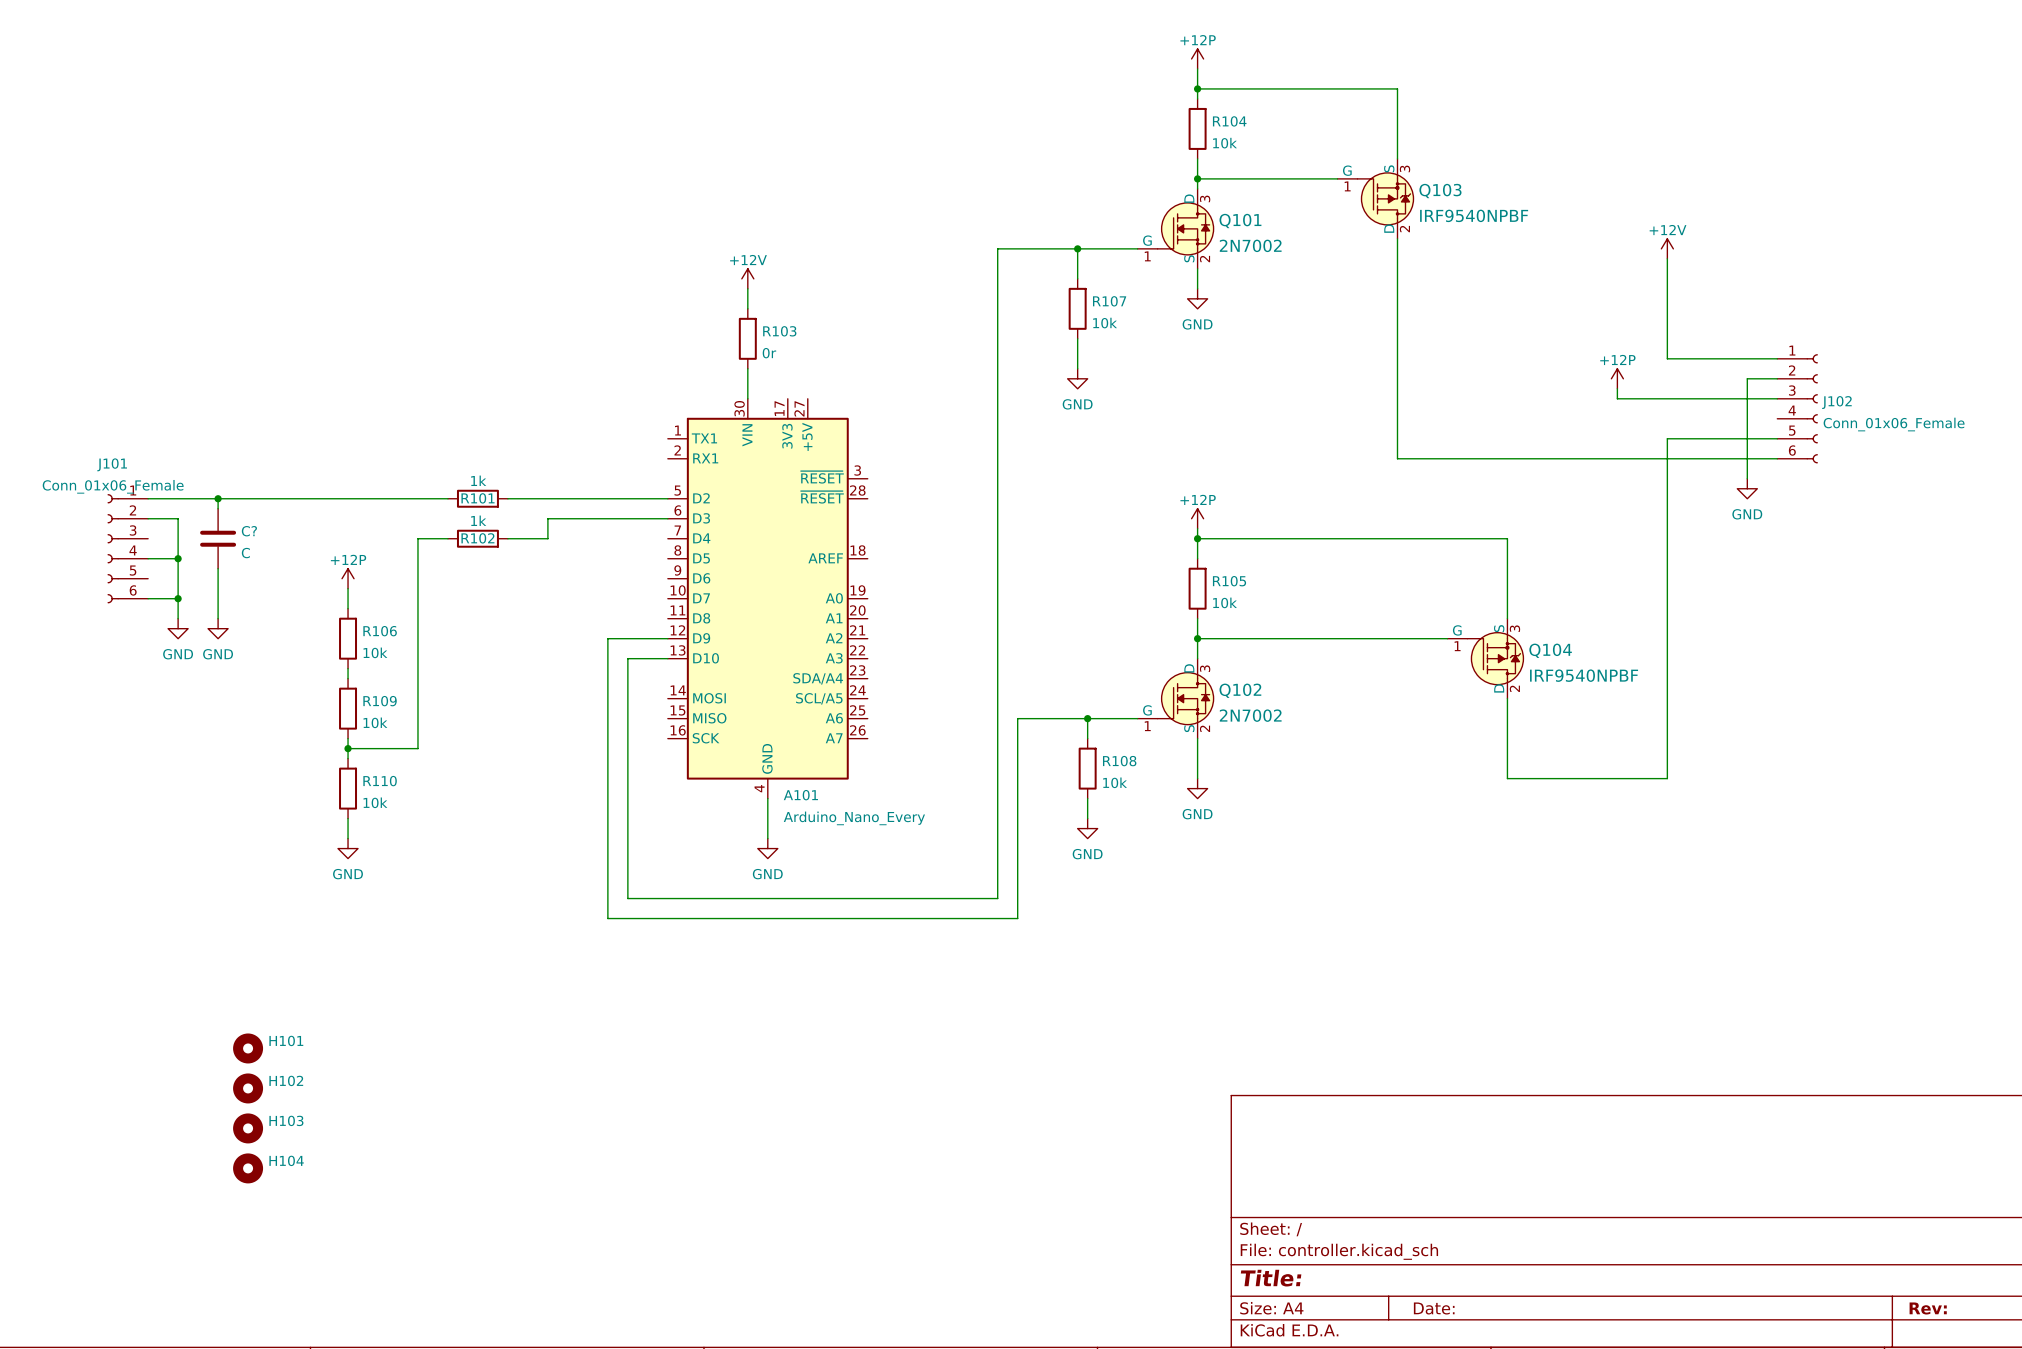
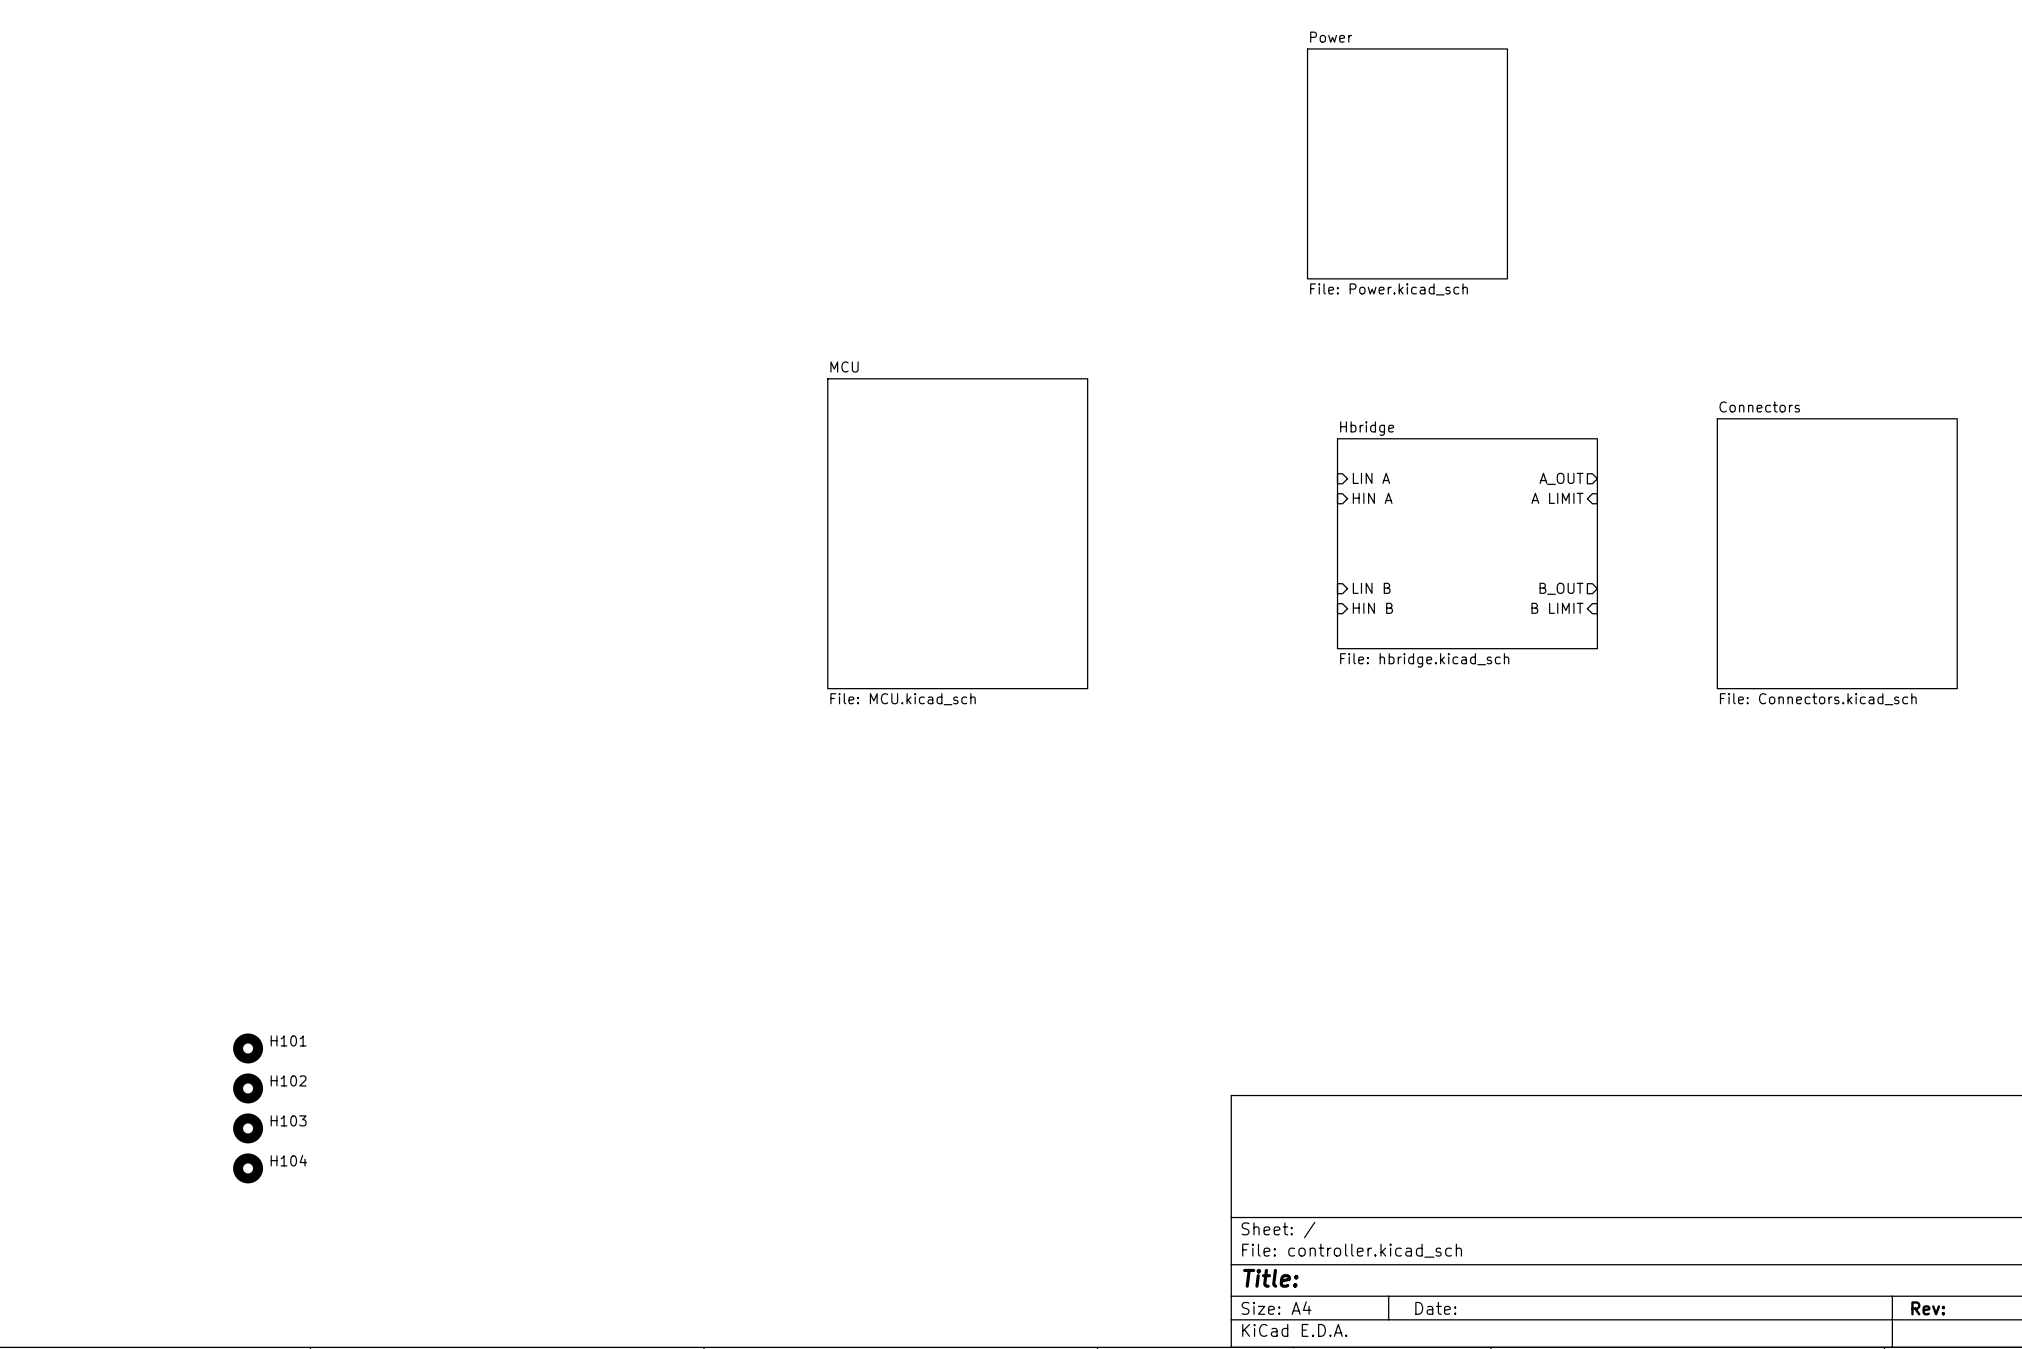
power symbol: +12P (1197, 58) -> none
wire: (1197, 68) (1197, 98) -> none
wire: (1197, 88) (1397, 88) (1397, 158) -> none
junction: (1197, 88) -> none
R104: 10k (1197, 128) -> none
wire: (1197, 158) (1197, 188) -> none
sheet Power: none -> File: Power.kicad_sch (1407, 163)
wire: (1197, 178) (1337, 178) -> none
junction: (1197, 178) -> none
Q103: IRF9540NPBF (1375, 198) -> none
Q101: 2N7002 (1175, 228) -> none
wire: (1397, 238) (1397, 458) (1777, 458) -> none
wire: (1077, 248) (1077, 278) -> none
junction: (1077, 248) -> none
wire: (1137, 248) (997, 248) (997, 898) (627, 898) (627, 658) (667, 658) -> none
power symbol: +12V (1667, 248) -> none
wire: (1667, 258) (1667, 358) (1777, 358) -> none
wire: (1197, 268) (1197, 288) -> none
power symbol: +12V (747, 278) -> none
wire: (747, 288) (747, 308) -> none
power symbol: GND (1197, 298) -> none
R107: 10k (1077, 308) -> none
R103: 0r (747, 338) -> none
wire: (1077, 338) (1077, 368) -> none
wire: (747, 368) (747, 398) -> none
power symbol: GND (1077, 378) -> none
power symbol: +12P (1617, 378) -> none
wire: (1777, 378) (1747, 378) (1747, 478) -> none
wire: (1617, 388) (1617, 398) (1777, 398) -> none
J102: Conn_01x06_Female (1797, 408) -> none
wire: (1777, 438) (1667, 438) (1667, 778) (1507, 778) (1507, 698) -> none
sheet pin: none -> LIN A (1371, 478)
sheet pin: none -> A_OUT (1561, 478)
power symbol: GND (1747, 488) -> none
wire: (148, 498) (447, 498) -> none
wire: (218, 498) (218, 508) -> none
junction: (218, 498) -> none
R101: 1k (477, 498) -> none
wire: (507, 498) (667, 498) -> none
sheet pin: none -> HIN A (1372, 498)
sheet pin: none -> A LIMIT (1557, 498)
wire: (148, 518) (178, 518) (178, 618) -> none
wire: (667, 518) (547, 518) (547, 538) (507, 538) -> none
power symbol: +12P (1197, 518) -> none
wire: (1197, 528) (1197, 558) -> none
sheet MCU: none -> File: MCU.kicad_sch (957, 533)
C?: C (218, 538) -> none
wire: (447, 538) (417, 538) (417, 748) (348, 748) -> none
R102: 1k (477, 538) -> none
wire: (1197, 538) (1507, 538) (1507, 618) -> none
junction: (1197, 538) -> none
sheet Hbridge: none -> File: hbridge.kicad_sch (1467, 543)
J101: Conn_01x06_Female (127, 548) -> none
sheet Connectors: none -> File: Connectors.kicad_sch (1837, 553)
wire: (148, 558) (178, 558) -> none
junction: (178, 558) -> none
wire: (218, 568) (218, 618) -> none
power symbol: +12P (348, 578) -> none
wire: (348, 588) (348, 608) -> none
R105: 10k (1197, 588) -> none
sheet pin: none -> LIN B (1371, 588)
sheet pin: none -> B_OUT (1561, 588)
wire: (148, 598) (178, 598) -> none
junction: (178, 598) -> none
A101: Arduino_Nano_Every (767, 598) -> none
sheet pin: none -> HIN B (1372, 608)
sheet pin: none -> B LIMIT (1557, 608)
wire: (1197, 618) (1197, 658) -> none
power symbol: GND (178, 628) -> none
power symbol: GND (218, 628) -> none
R106: 10k (348, 638) -> none
wire: (667, 638) (607, 638) (607, 918) (1017, 918) (1017, 718) (1137, 718) -> none
wire: (1197, 638) (1447, 638) -> none
junction: (1197, 638) -> none
Q104: IRF9540NPBF (1485, 658) -> none
wire: (348, 668) (348, 678) -> none
Q102: 2N7002 (1175, 698) -> none
R109: 10k (348, 708) -> none
wire: (1087, 718) (1087, 738) -> none
junction: (1087, 718) -> none
wire: (348, 738) (348, 758) -> none
wire: (1197, 738) (1197, 778) -> none
junction: (348, 748) -> none
R108: 10k (1087, 768) -> none
R110: 10k (348, 788) -> none
power symbol: GND (1197, 788) -> none
wire: (767, 798) (767, 838) -> none
wire: (1087, 798) (1087, 818) -> none
wire: (348, 818) (348, 838) -> none
power symbol: GND (1087, 828) -> none
power symbol: GND (348, 848) -> none
power symbol: GND (767, 848) -> none

